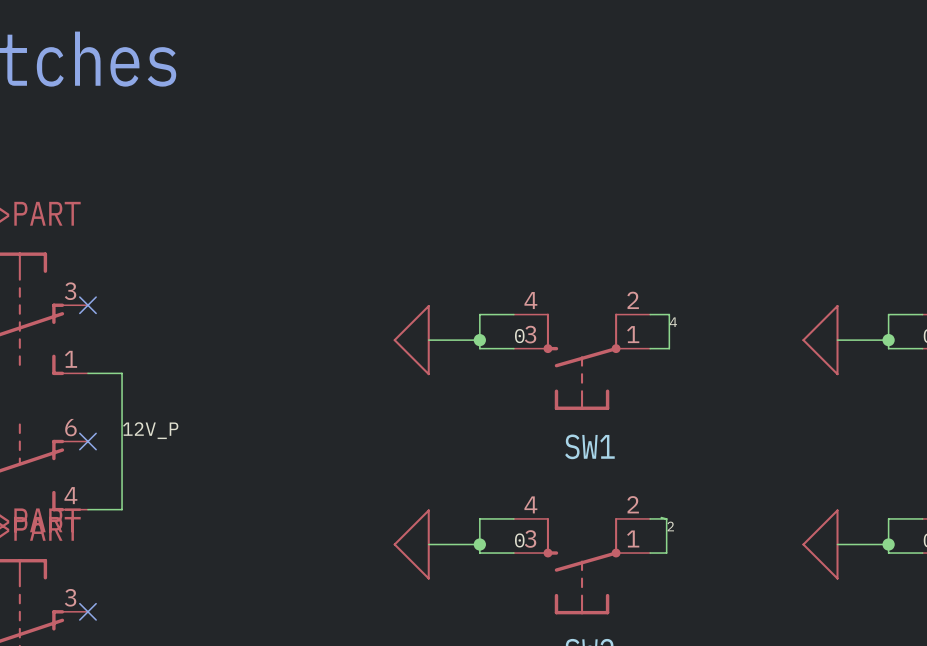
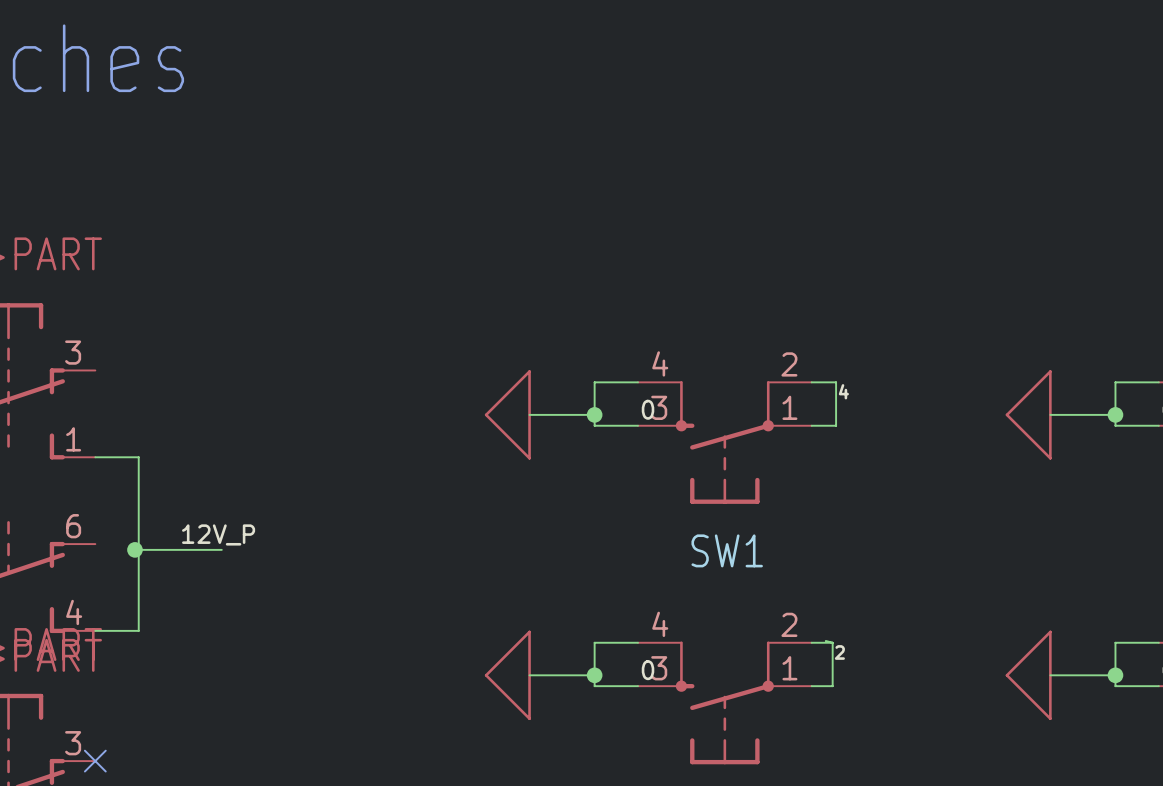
no-connect mark: (87, 305) -> none
label position: 12V_P (150, 430) -> 12V_P (218, 534)
no-connect mark: (87, 441) -> none
wire: none -> (134, 549) (221, 549)
junction: none -> (134, 549)

